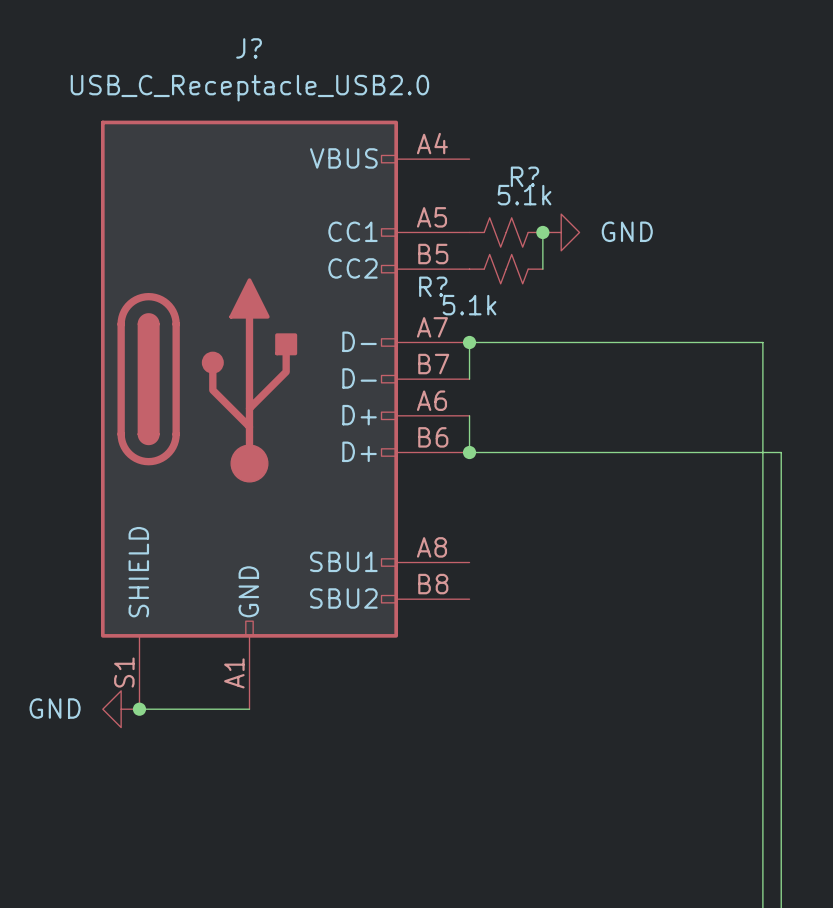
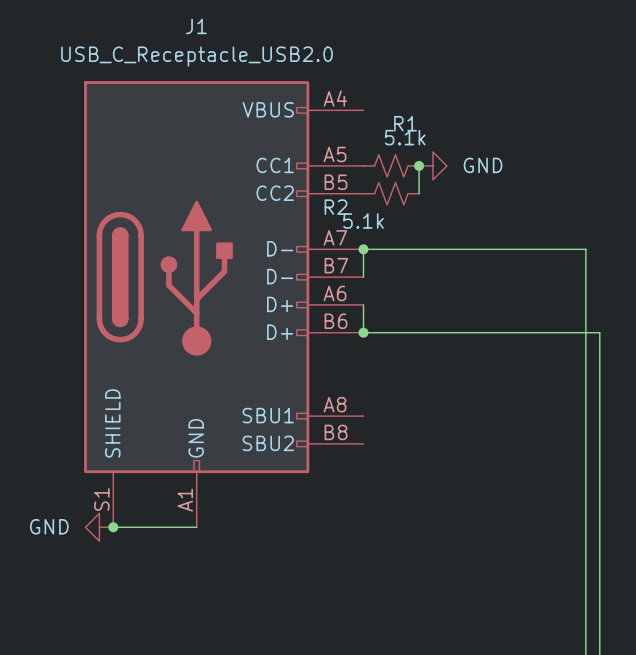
J? name: J? (249, 48) -> J1 (196, 26)
R? name: R? (524, 176) -> R1 (405, 123)
R? name: R? (433, 286) -> R2 (336, 207)

